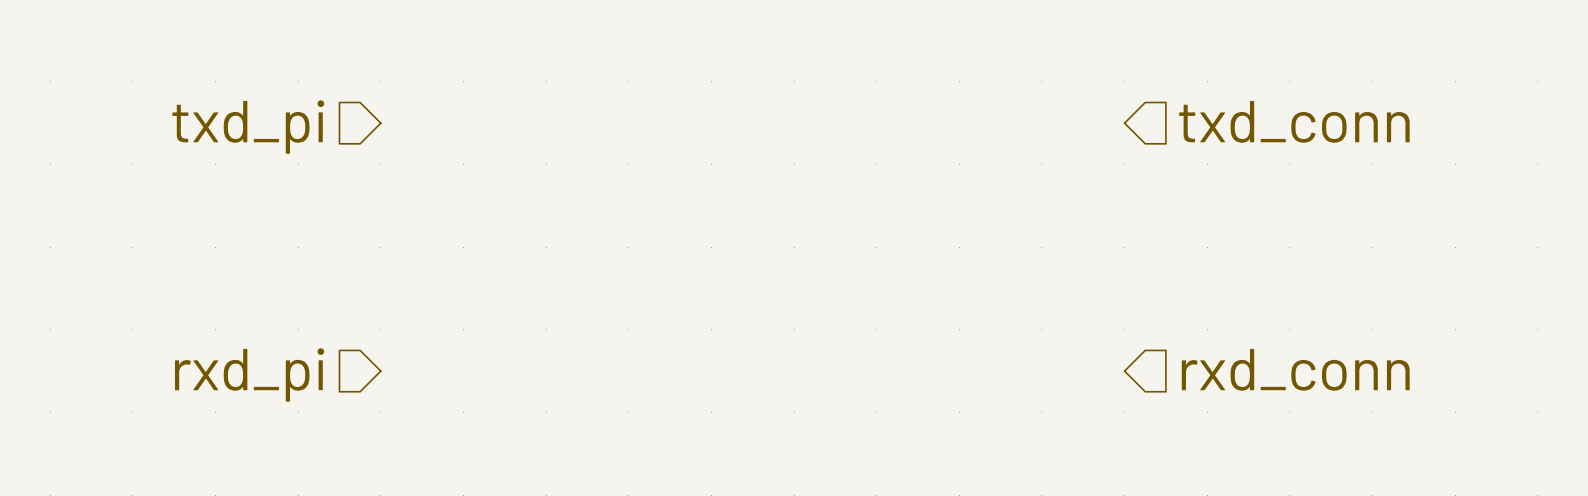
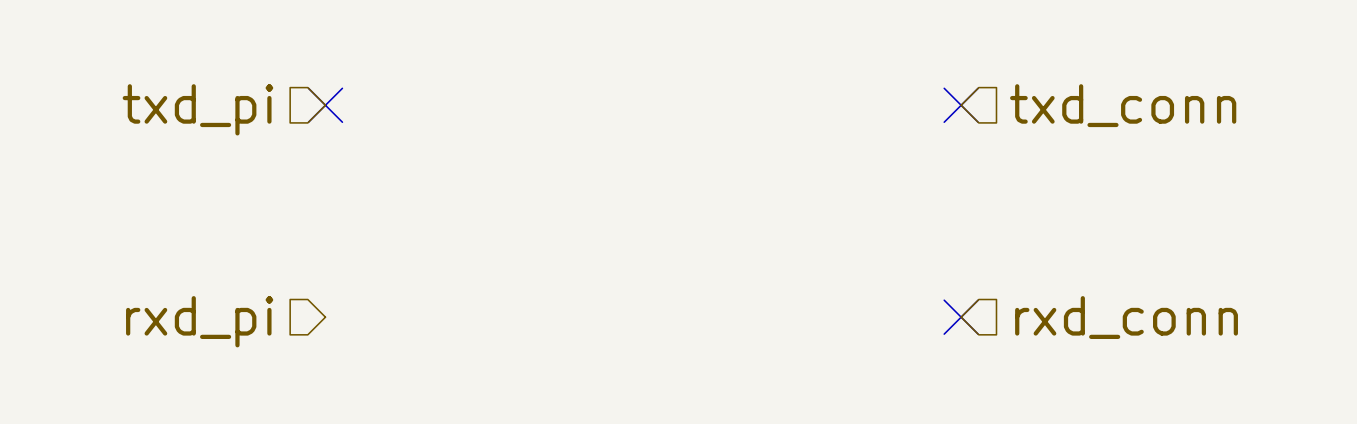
no-connect mark: none -> (325, 105)
no-connect mark: none -> (961, 105)
no-connect mark: none -> (961, 317)

